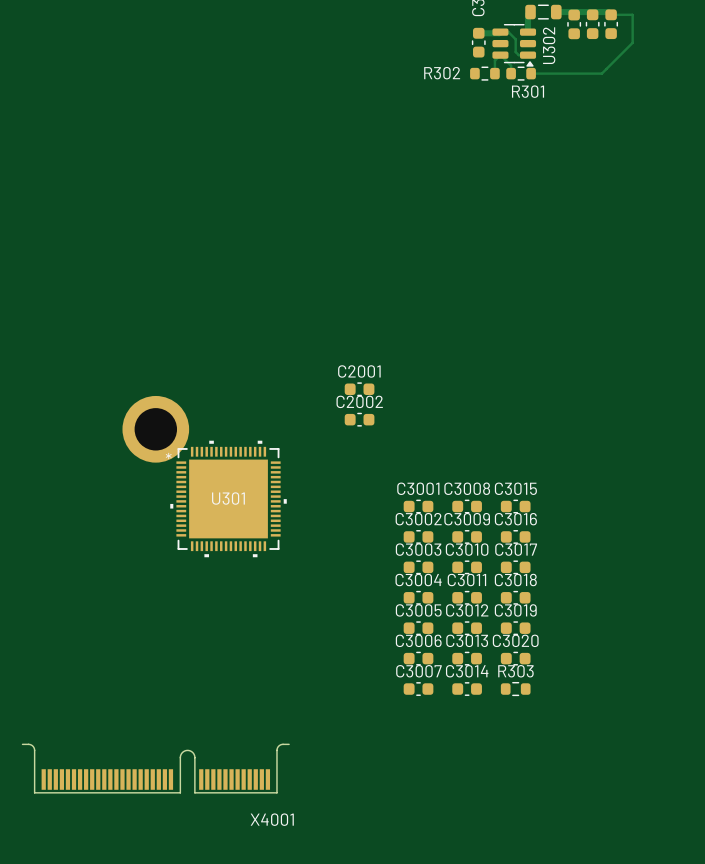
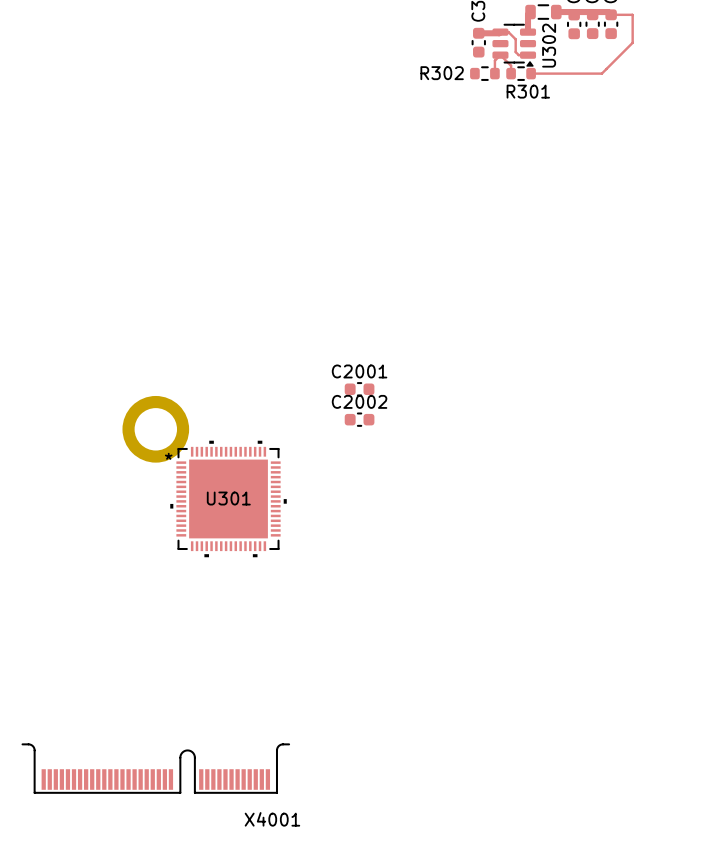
C3001: (418, 506) -> none
C3008: (467, 506) -> none
C3015: (515, 506) -> none
C3002: (418, 536) -> none
C3009: (467, 536) -> none
C3016: (515, 536) -> none
C3003: (418, 567) -> none
C3010: (467, 567) -> none
C3017: (515, 567) -> none
C3004: (418, 597) -> none
C3011: (467, 597) -> none
C3018: (515, 597) -> none
C3005: (418, 628) -> none
C3012: (467, 628) -> none
C3019: (515, 628) -> none
C3006: (418, 658) -> none
C3013: (467, 658) -> none
C3020: (515, 658) -> none
C3007: (418, 689) -> none
C3014: (467, 689) -> none
R303: (515, 689) -> none

